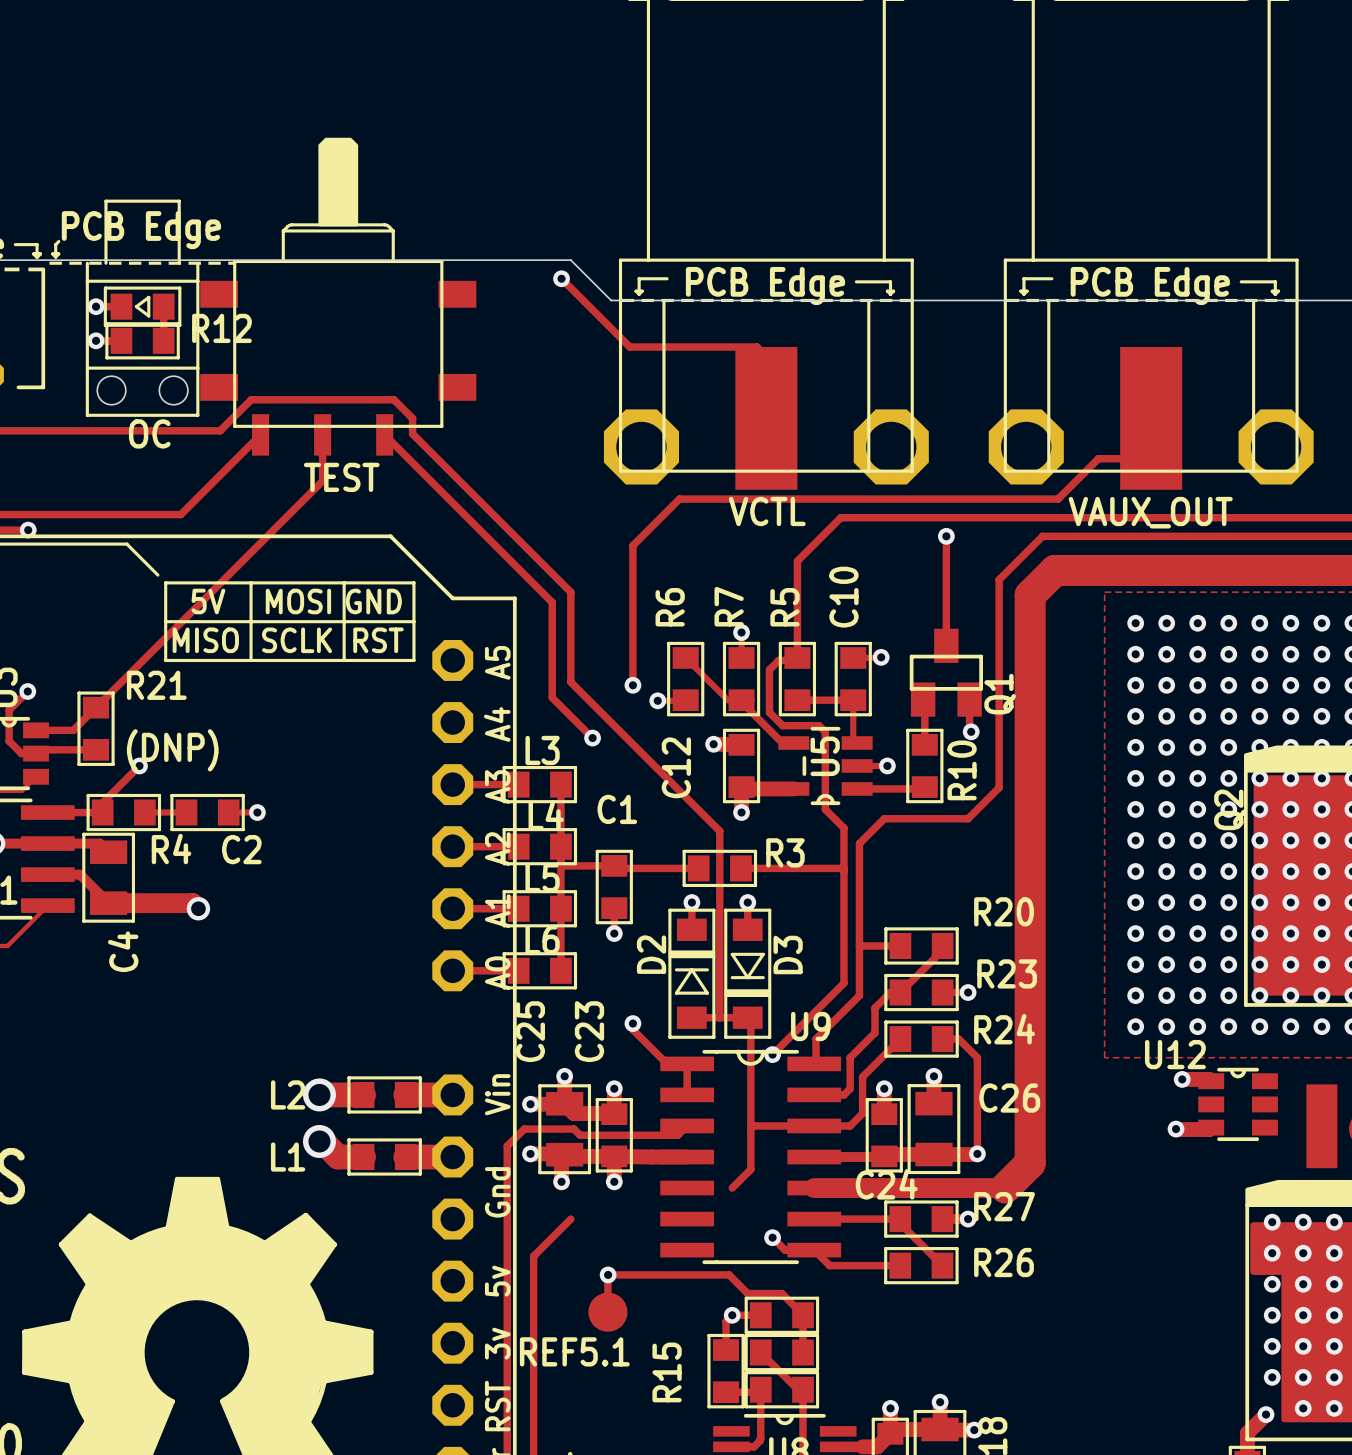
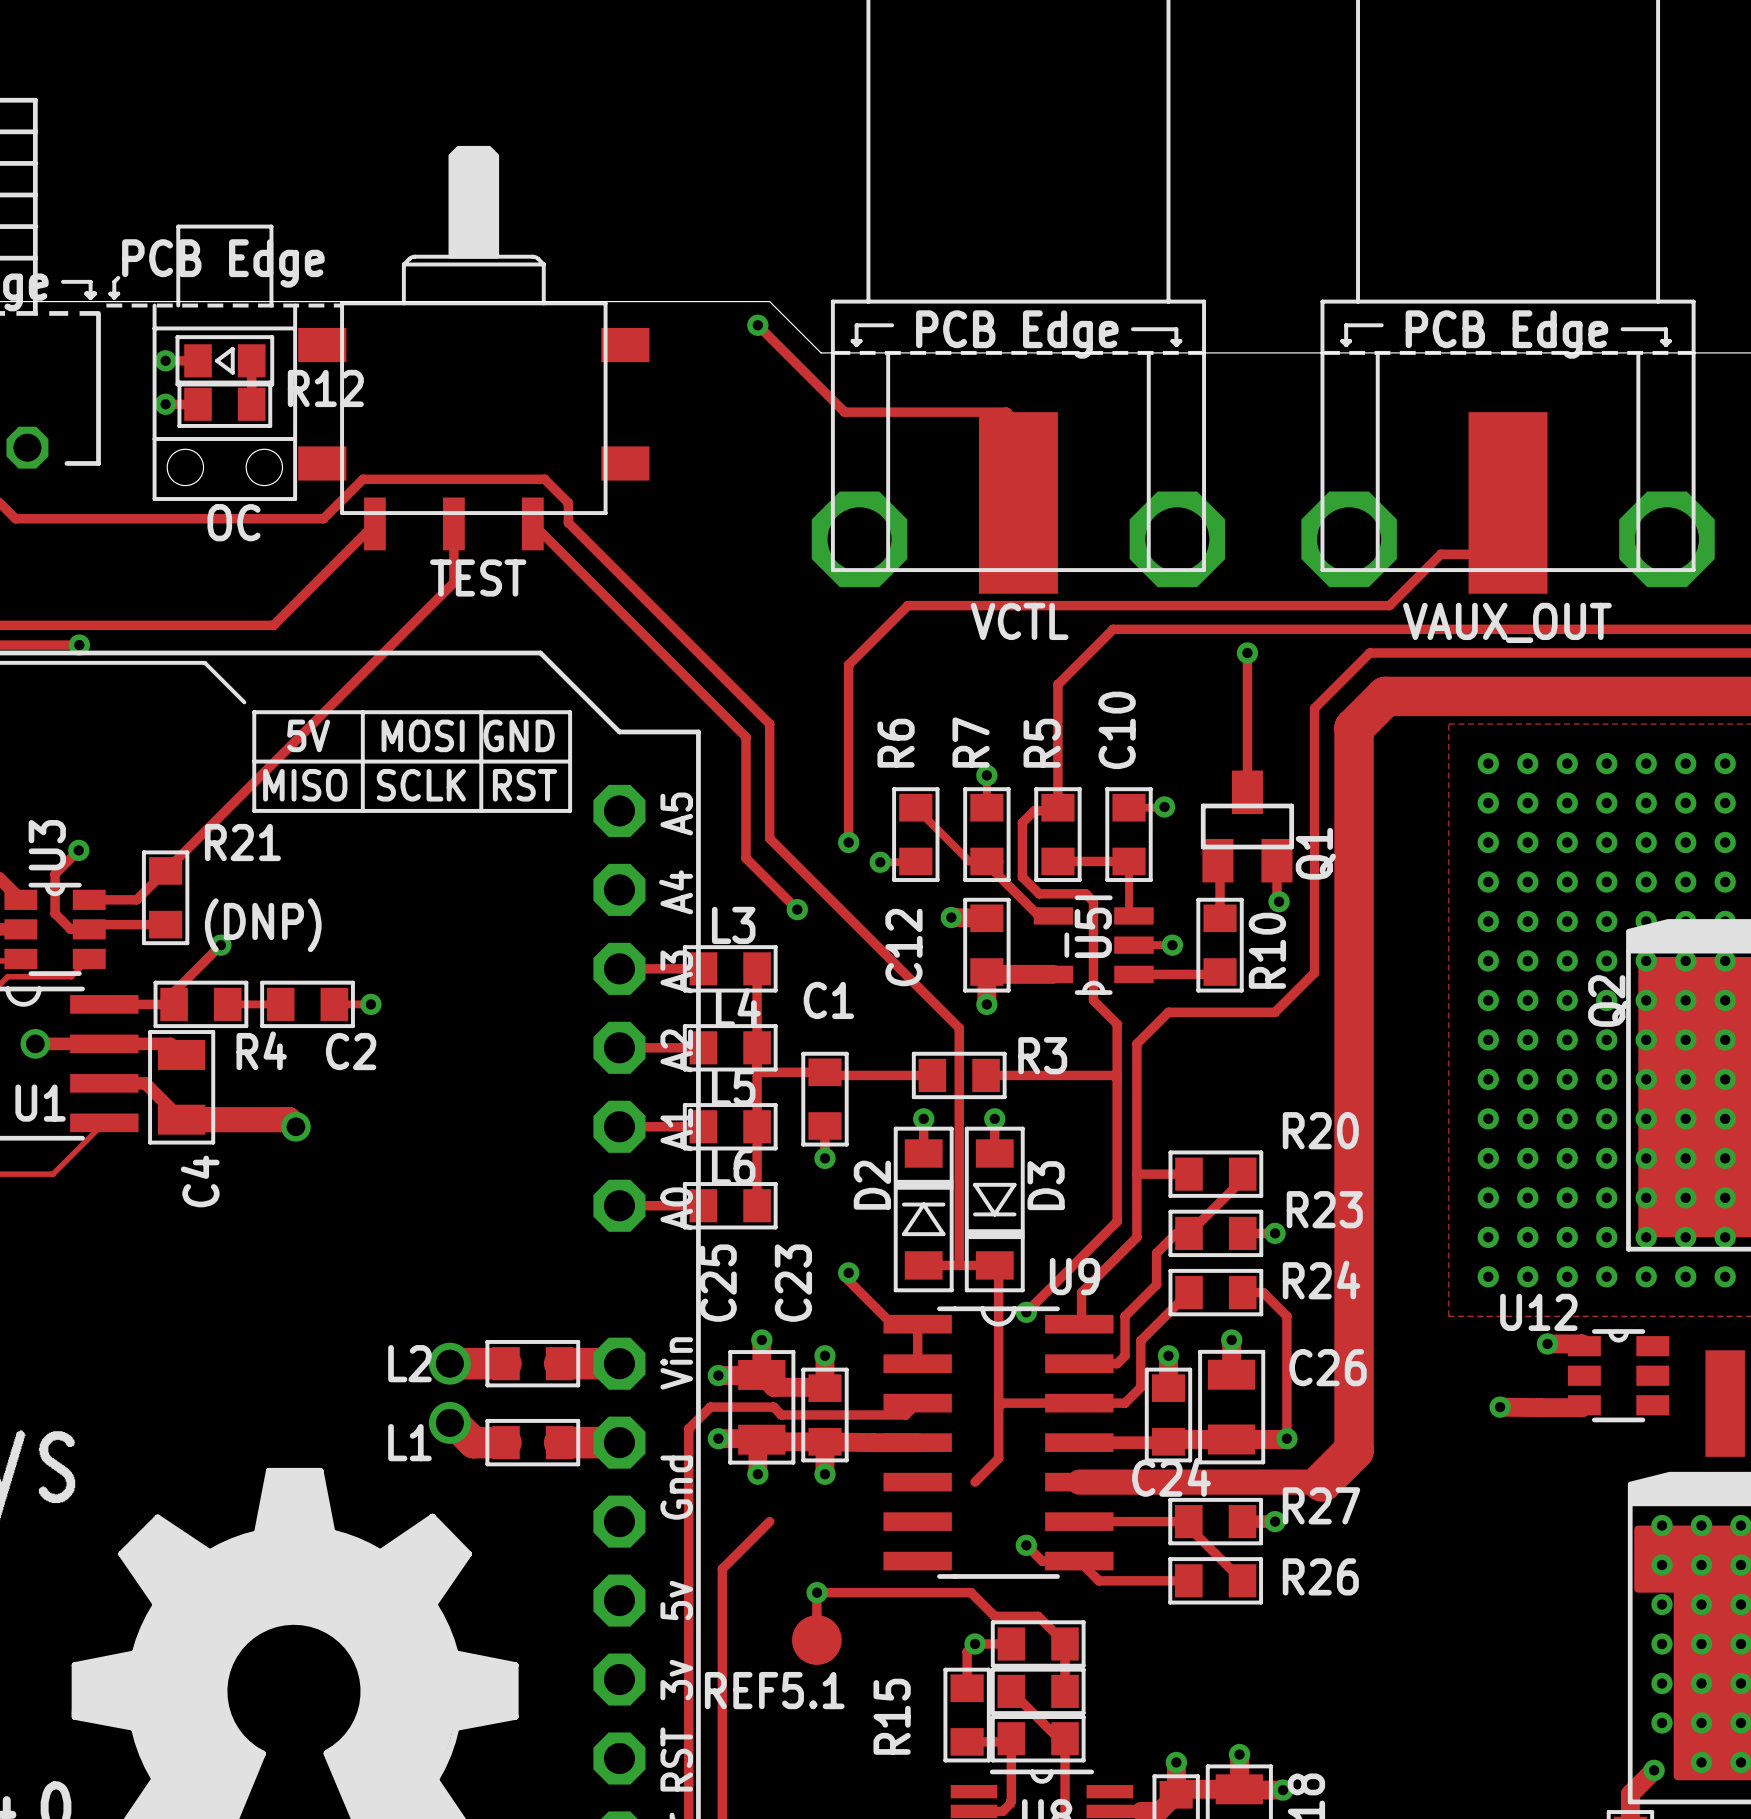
track: none -> (1500, 1407) (1539, 1407)
via position: (1176, 1129) -> (1500, 1407)

